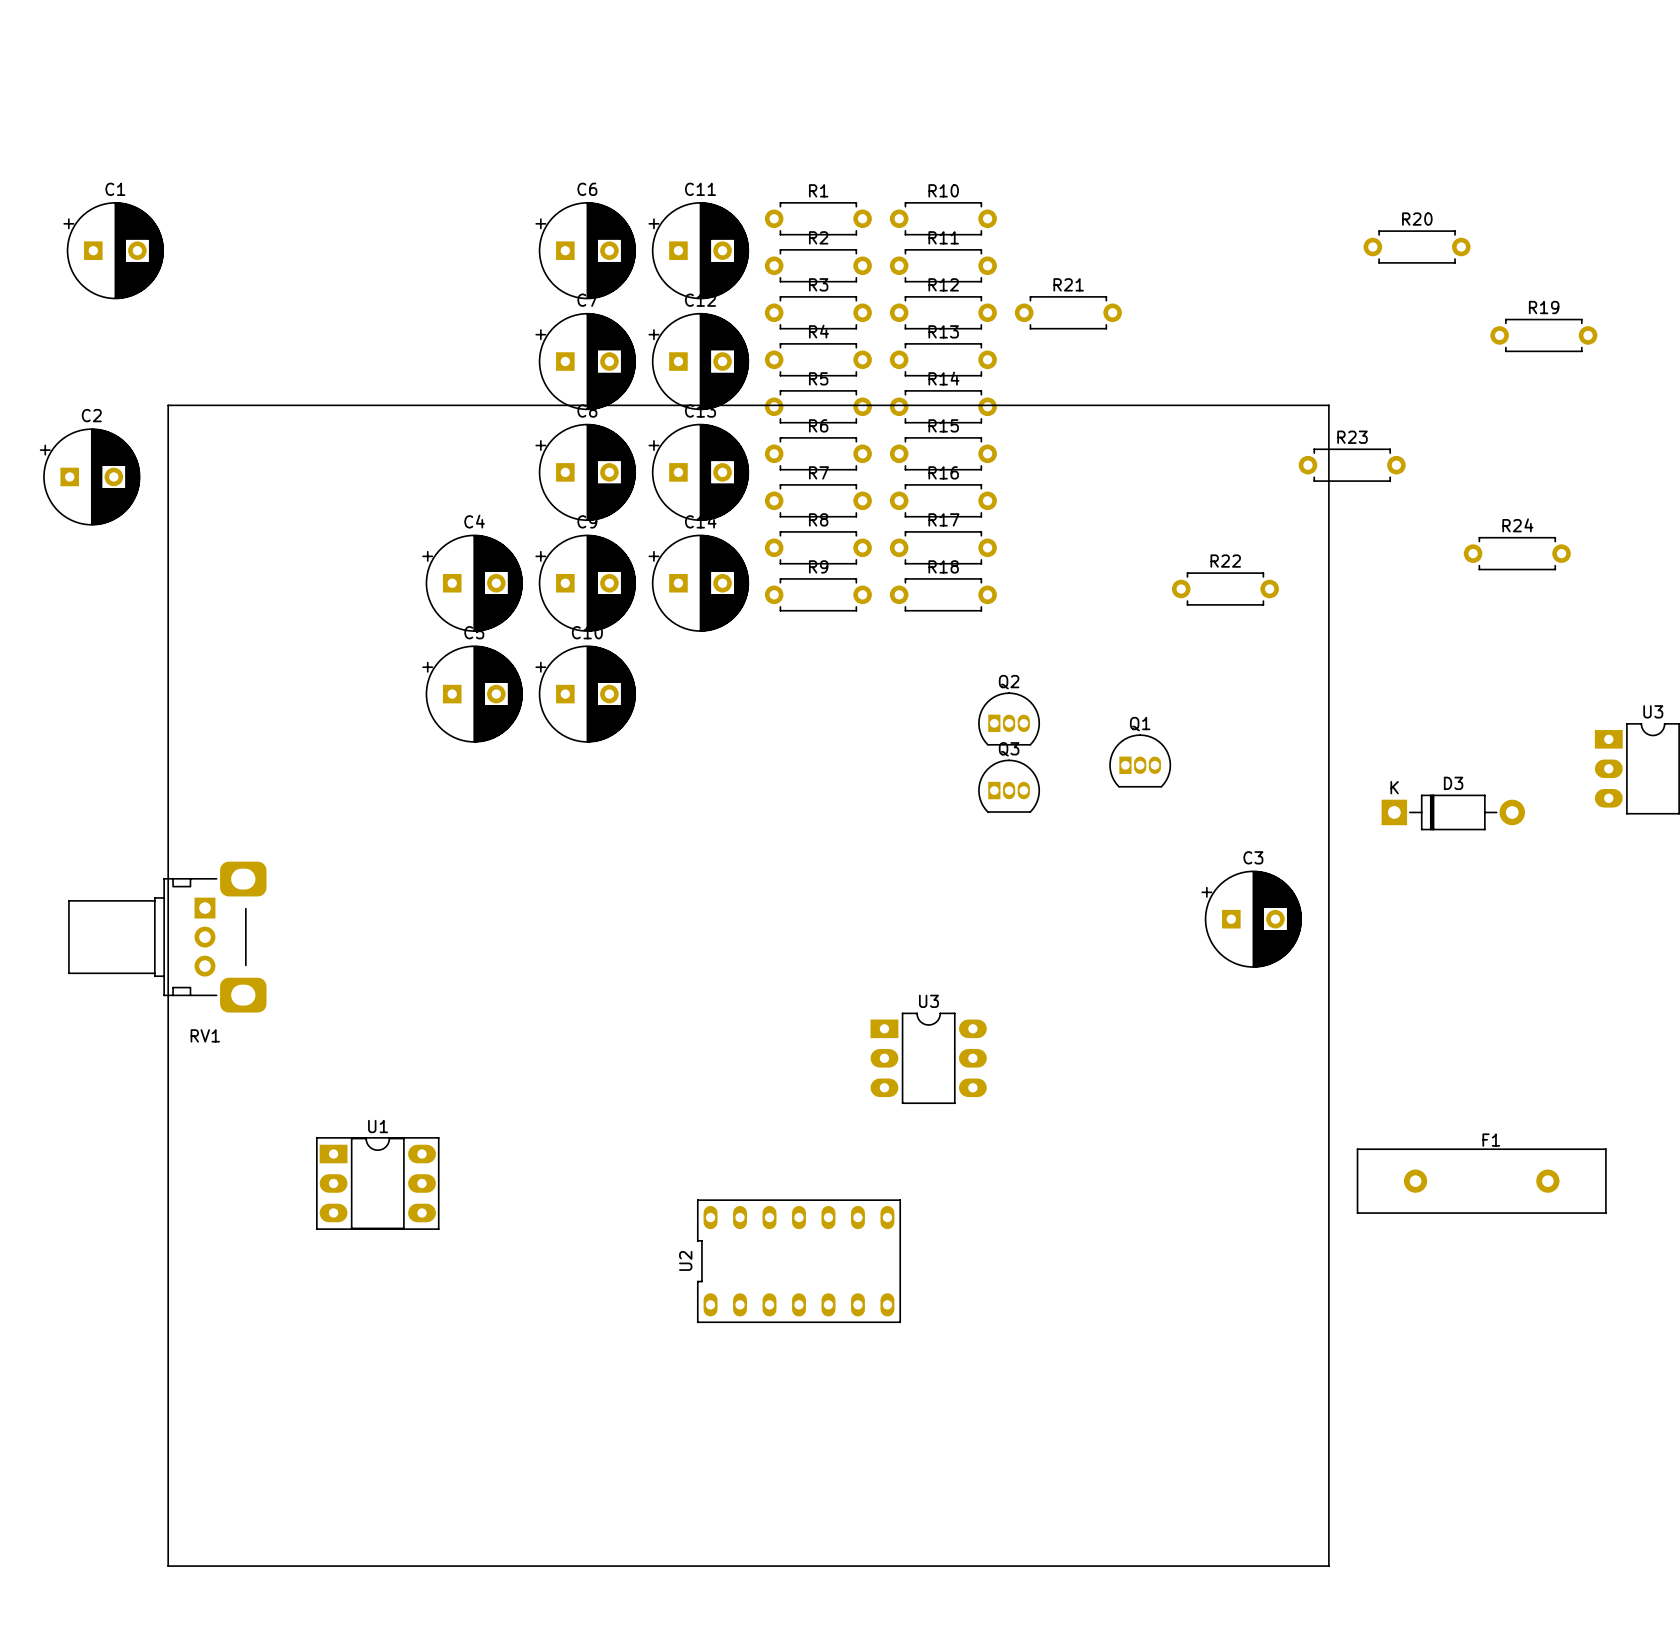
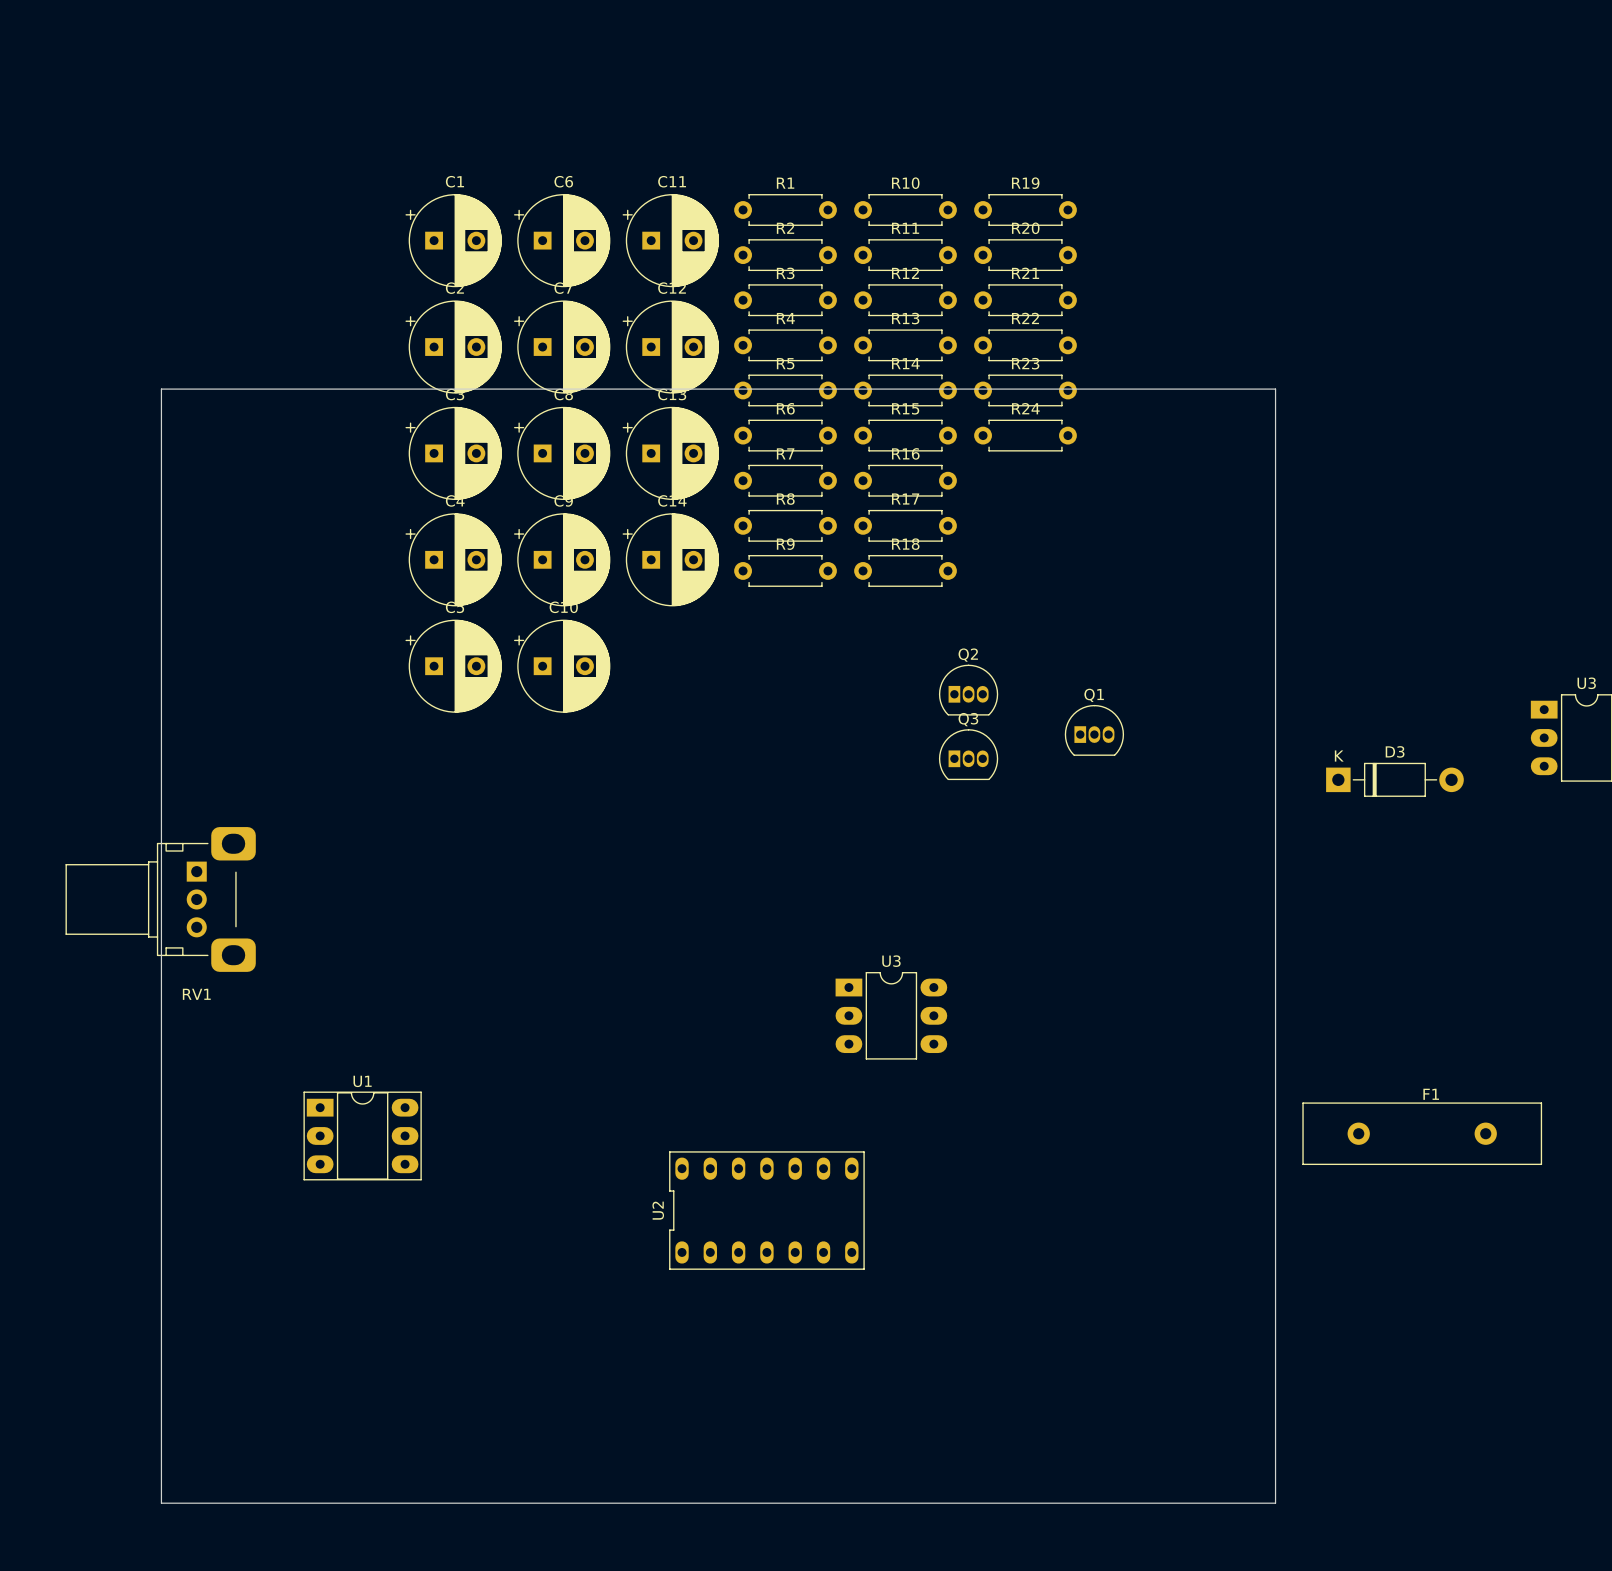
R20 position: (1417, 247) -> (1025, 255)
C1 position: (113, 250) -> (453, 240)
R19 position: (1543, 335) -> (1025, 209)
R23 position: (1352, 465) -> (1025, 390)
C2 position: (90, 476) -> (453, 347)
R24 position: (1517, 553) -> (1025, 435)
R22 position: (1225, 589) -> (1025, 345)
C3 position: (1251, 919) -> (453, 453)

